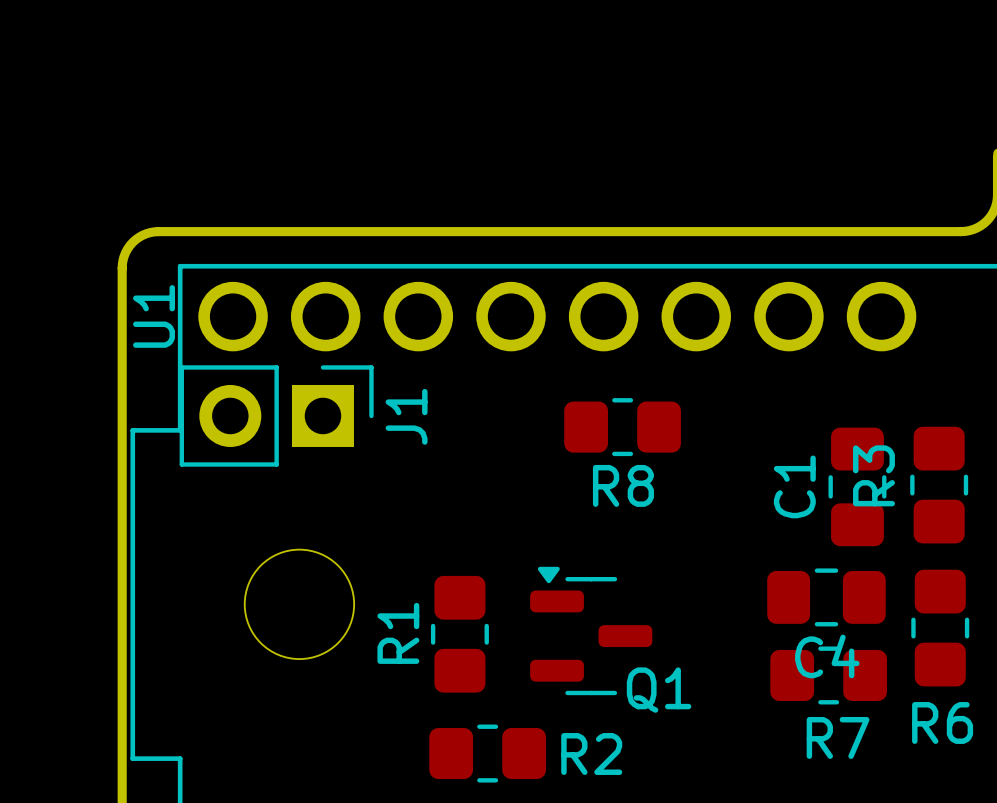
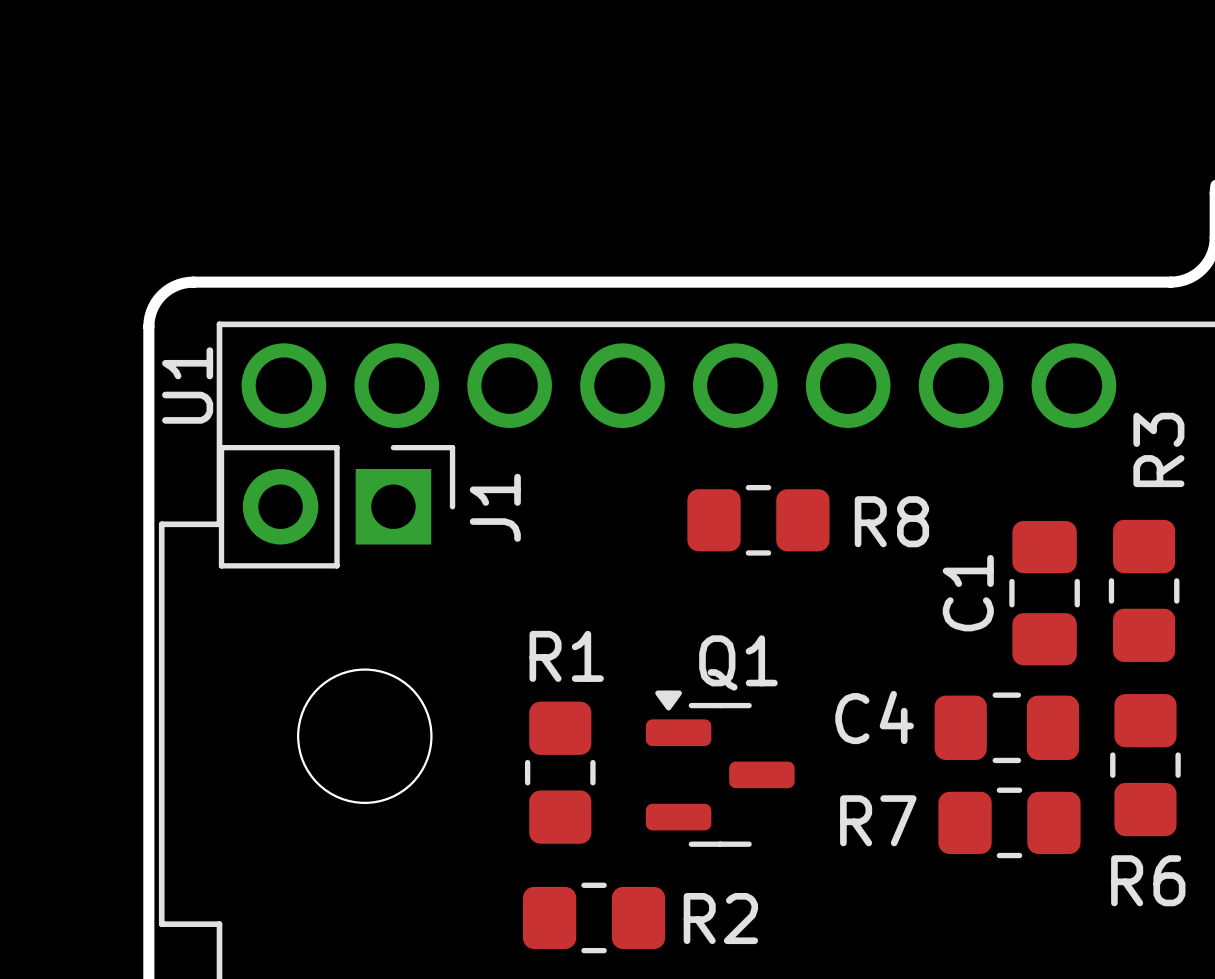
R3 name position: R3 (873, 475) -> R3 (1158, 449)
R8 name position: R8 (623, 485) -> R8 (891, 521)
R1 name rotation: 0° (398, 633) -> 90° clockwise (566, 656)
R1 name position: R1 (398, 633) -> R1 (566, 656)
C4 name position: C4 (827, 656) -> C4 (874, 717)
Q1 name position: Q1 (659, 690) -> Q1 (738, 662)
R7 name position: R7 (838, 737) -> R7 (878, 820)

